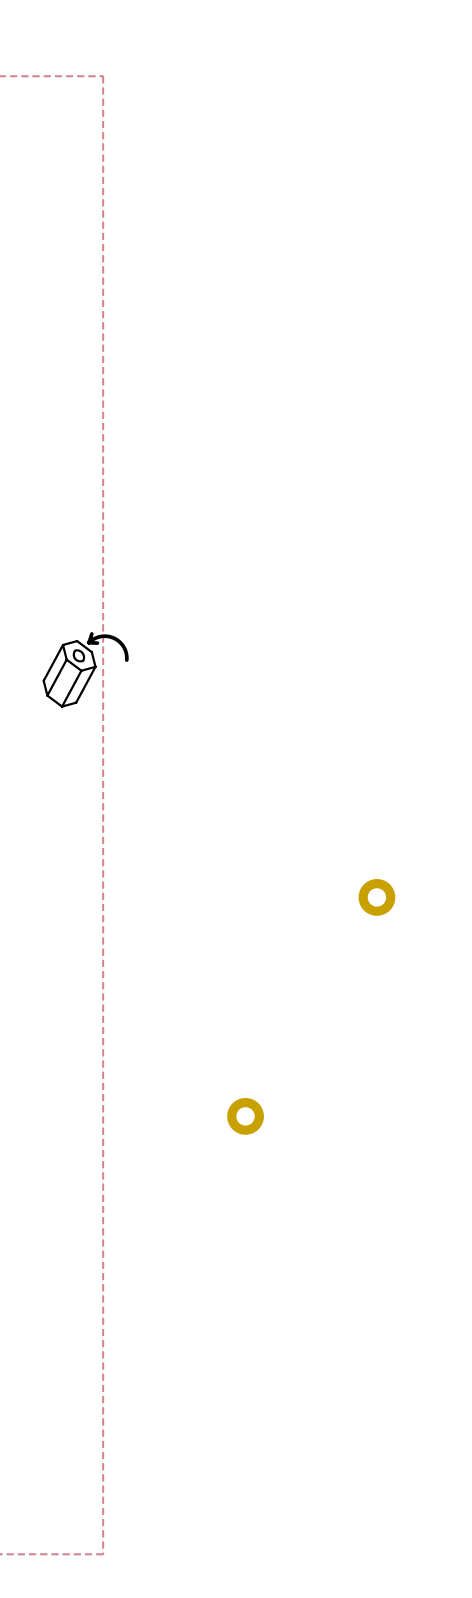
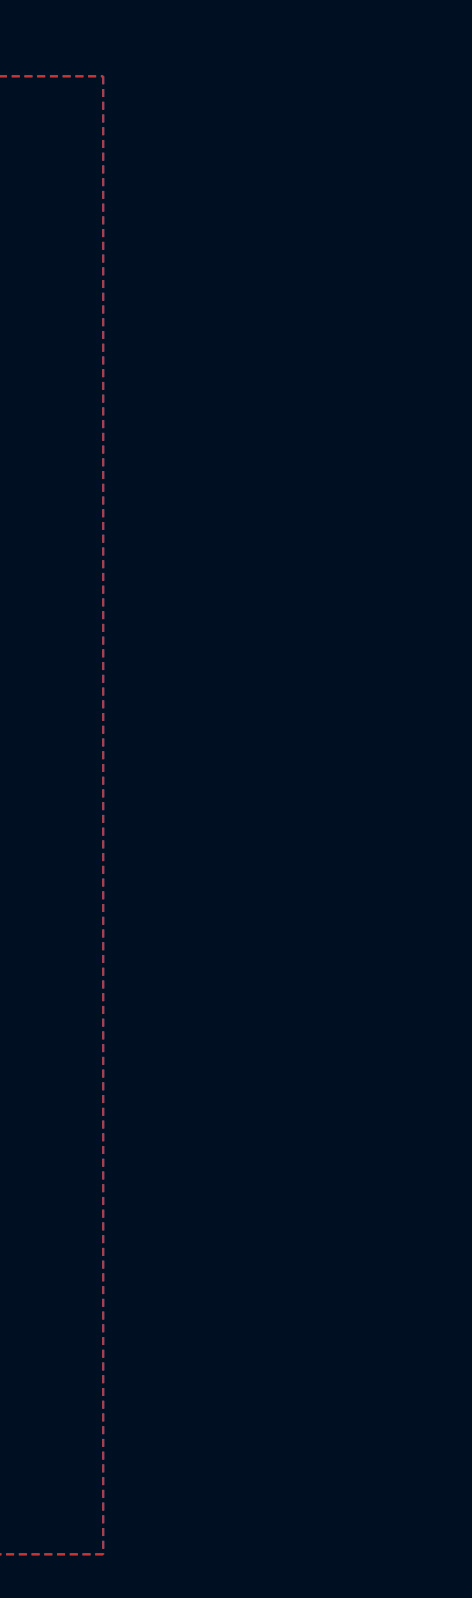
drawing: [42, 632, 129, 708] -> none
part: (376, 897) -> none
part: (245, 1116) -> none

